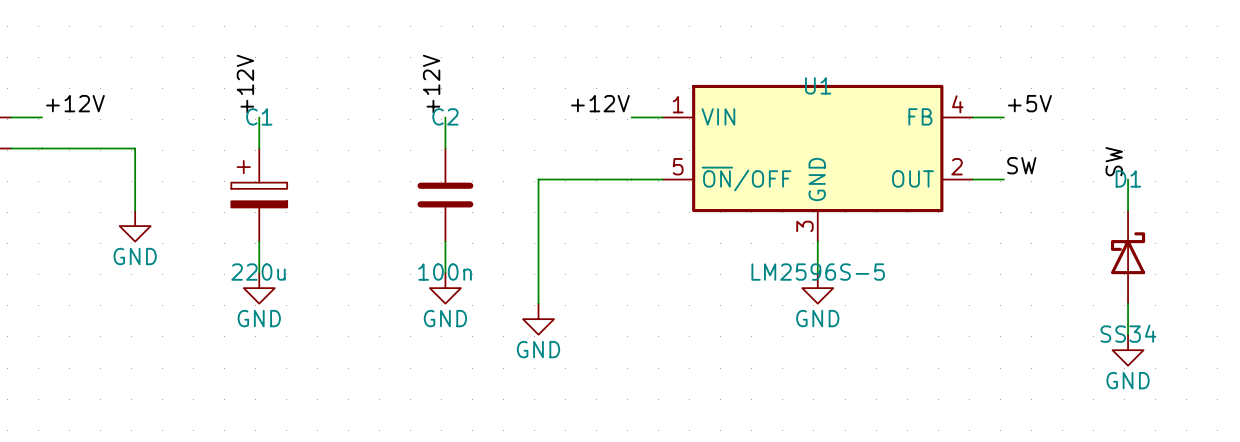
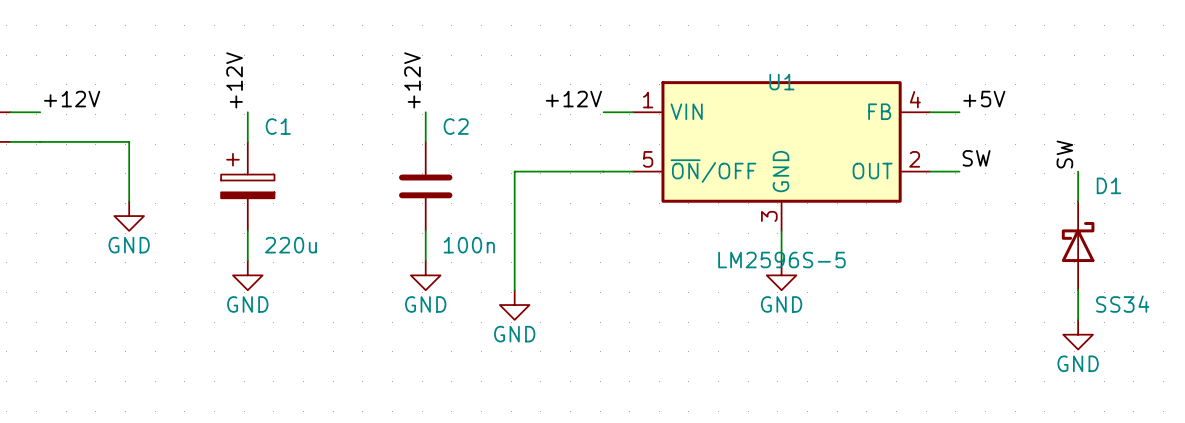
C1 name position: C1 (259, 116) -> C1 (278, 126)
C2 name position: C2 (445, 116) -> C2 (456, 126)
D1 name position: D1 (1128, 178) -> D1 (1108, 185)
C1 value position: 220u (258, 272) -> 220u (290, 245)
C2 value position: 100n (445, 272) -> 100n (469, 245)
D1 value position: SS34 (1128, 333) -> SS34 (1122, 304)

